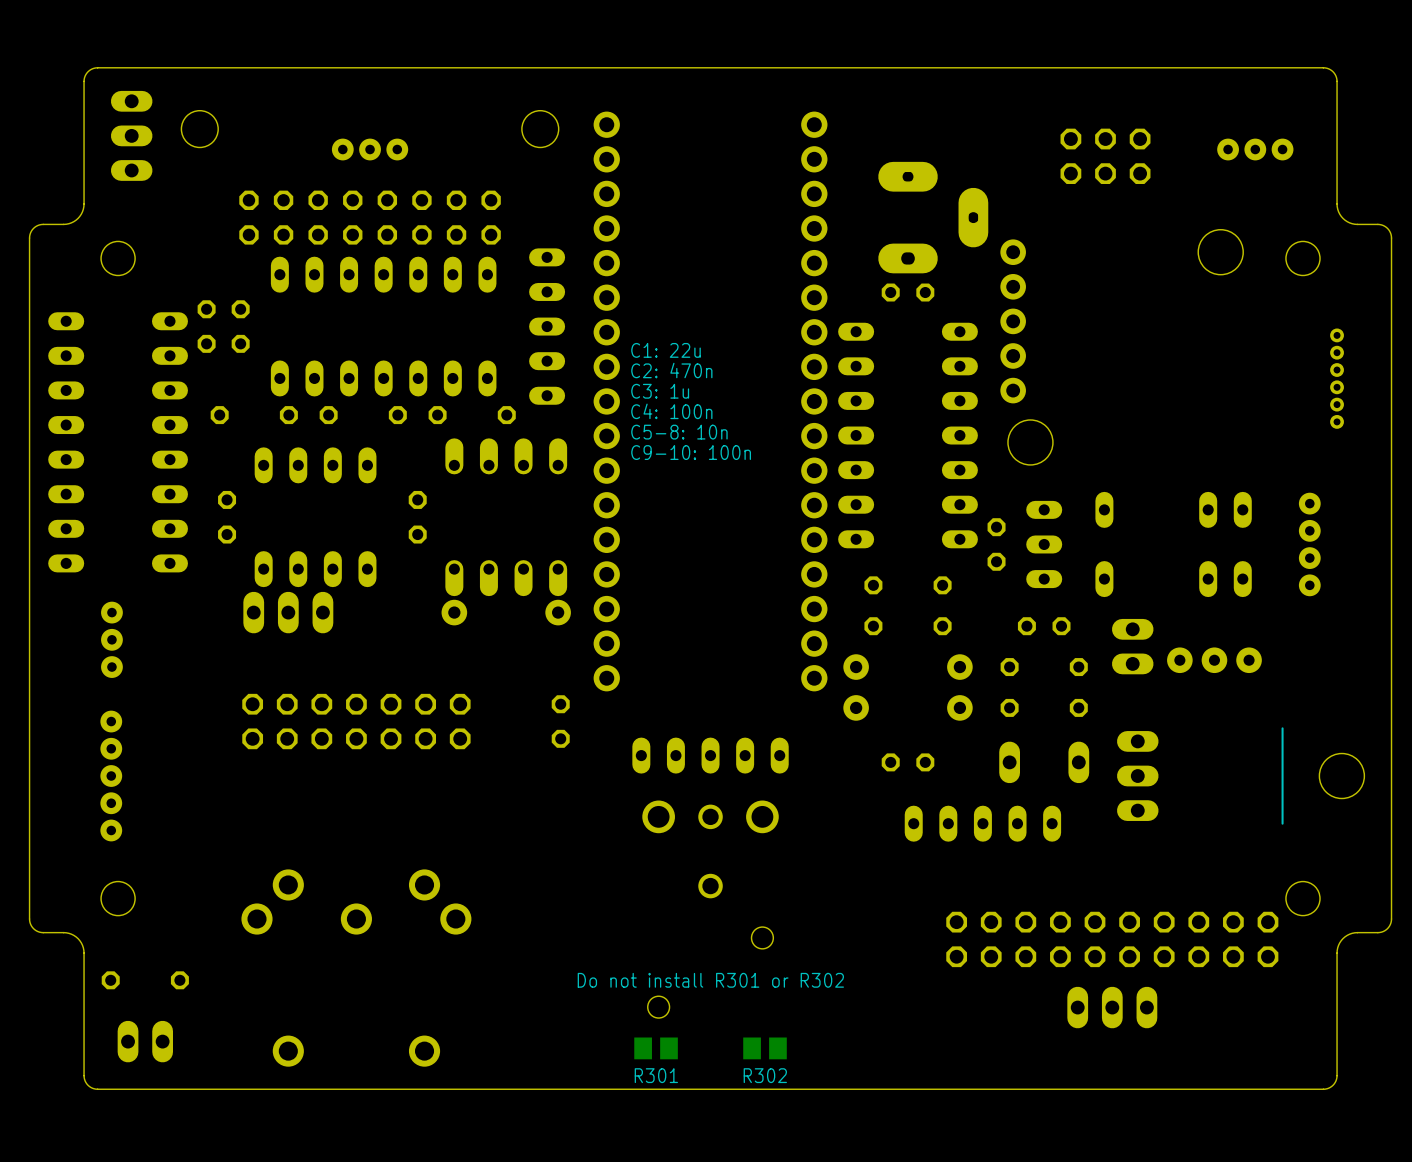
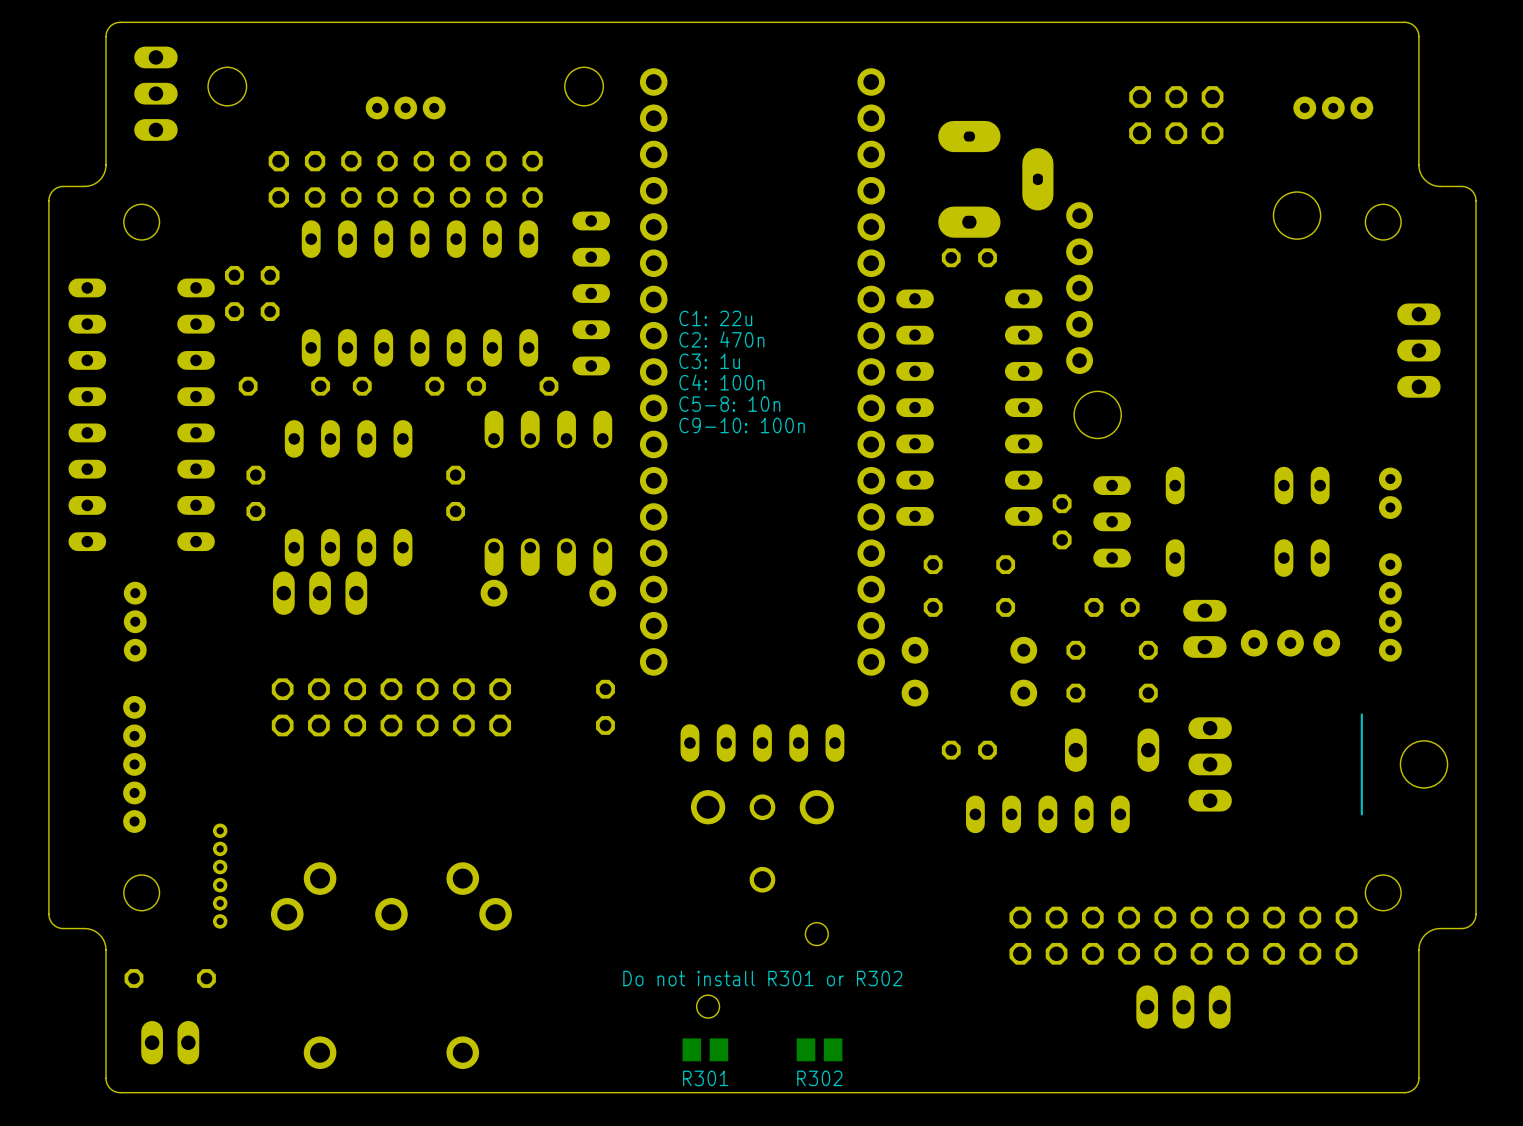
part footprint: [1330, 328, 1344, 429] -> [1397, 303, 1441, 398]
part position: (1309, 544) -> (1390, 607)
part: none -> (220, 876)

